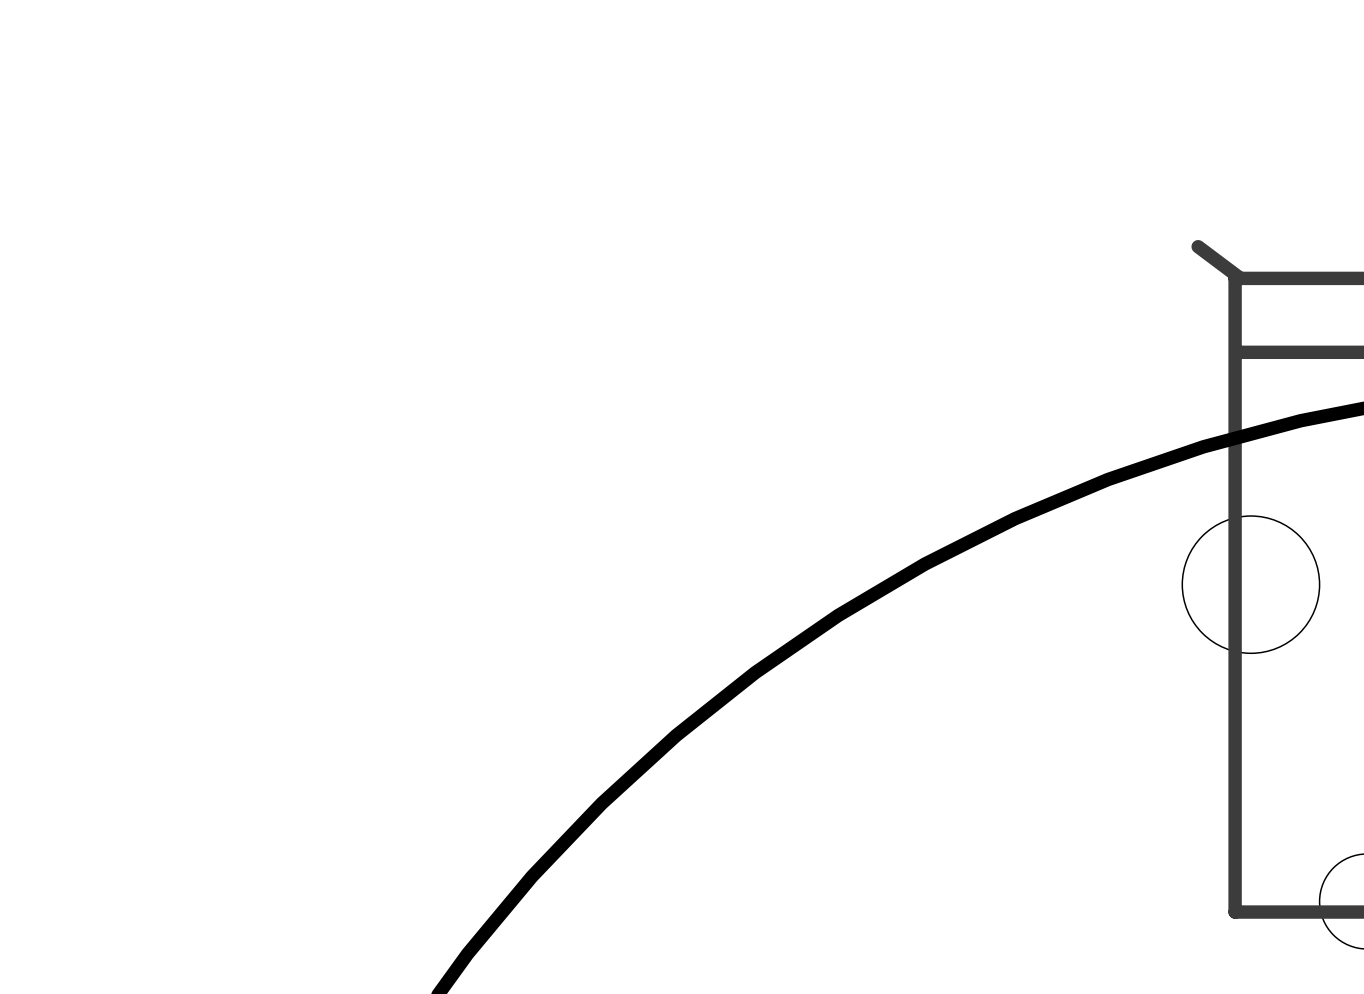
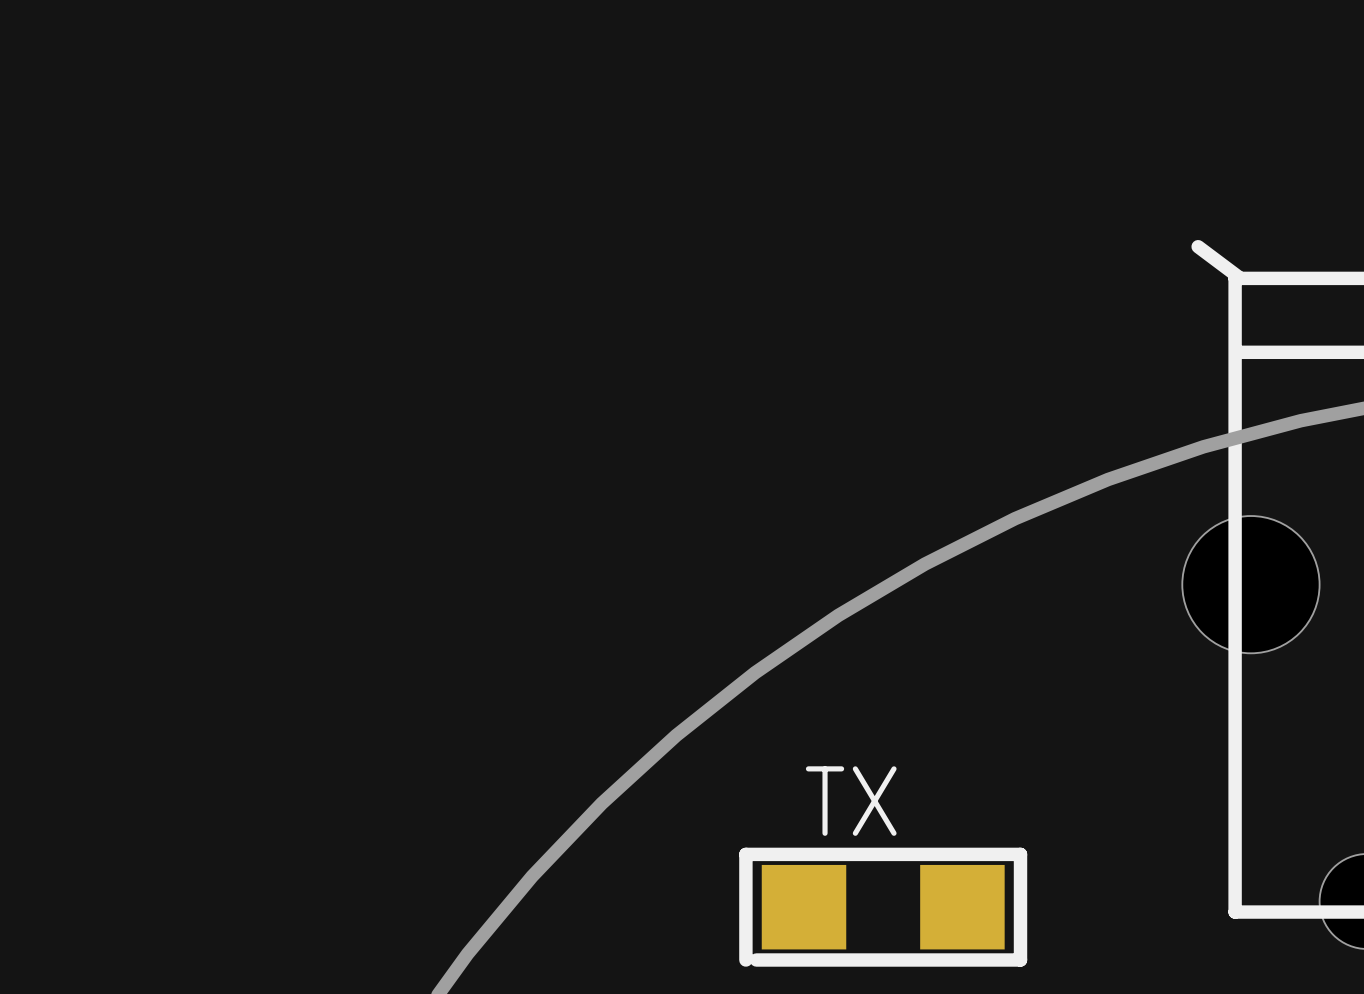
TX: none -> (883, 907)

